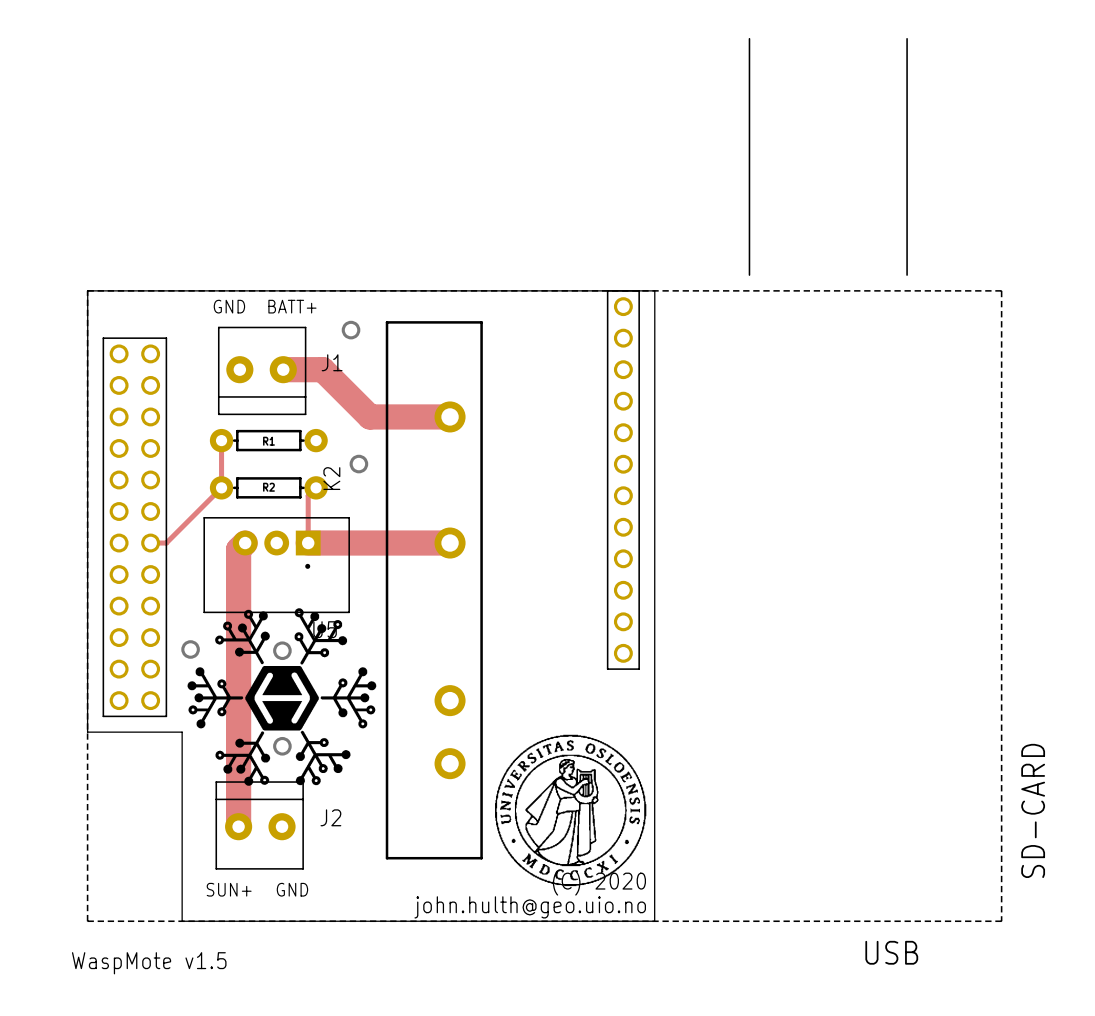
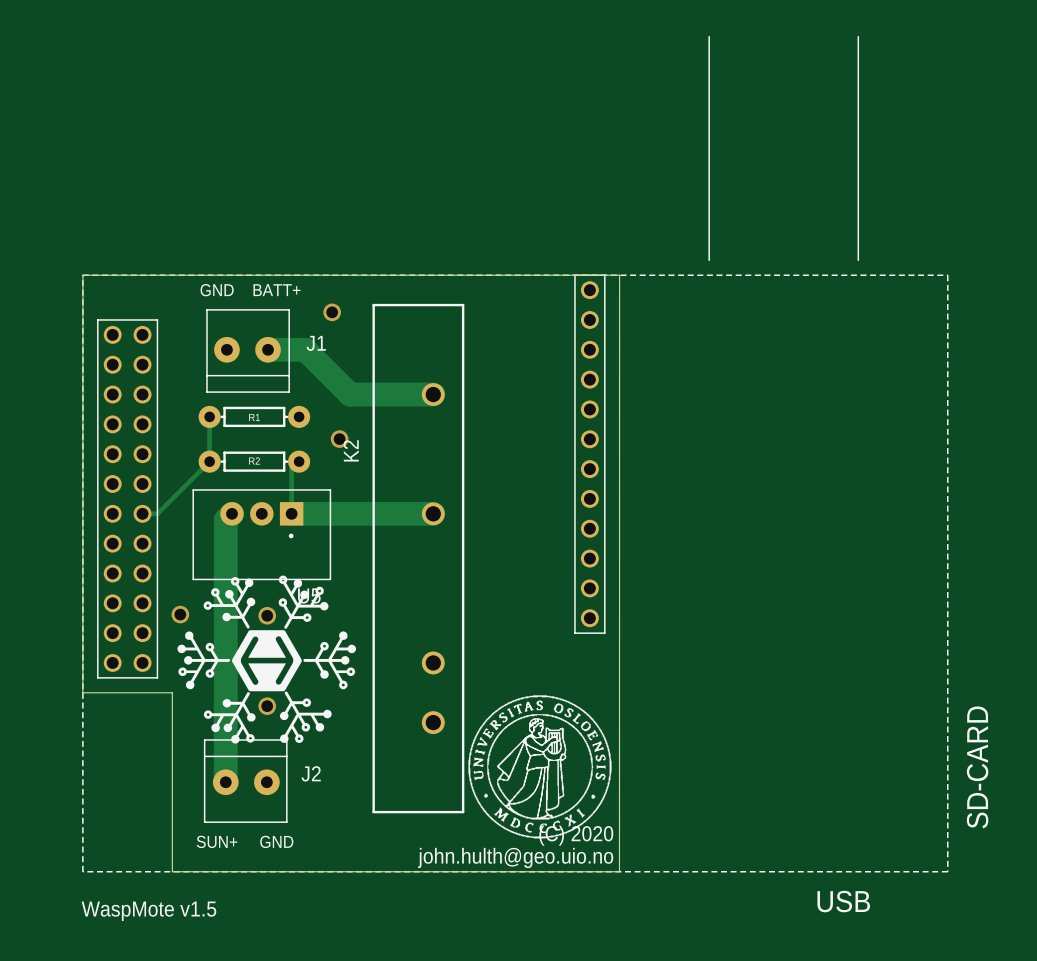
K2 footprint: [385, 321, 483, 860] -> [372, 303, 465, 814]
K2 name position: K2 (331, 478) -> K2 (351, 450)

